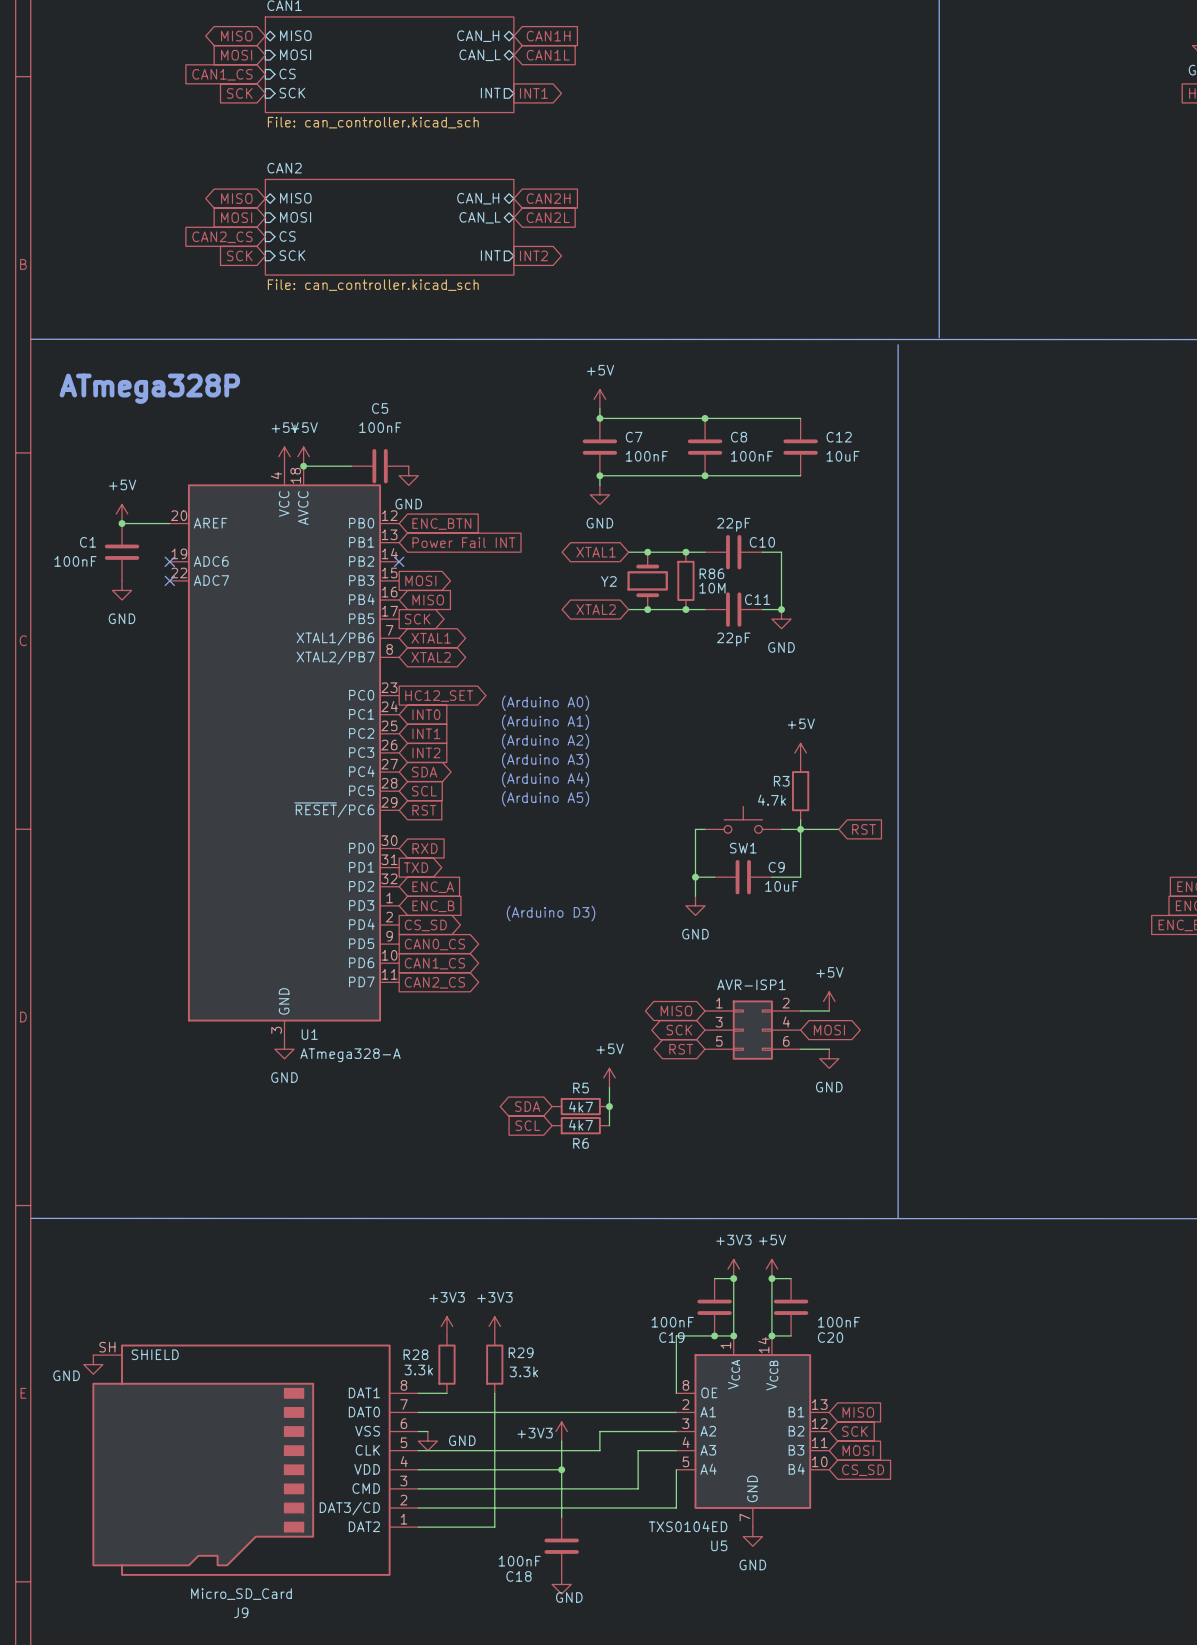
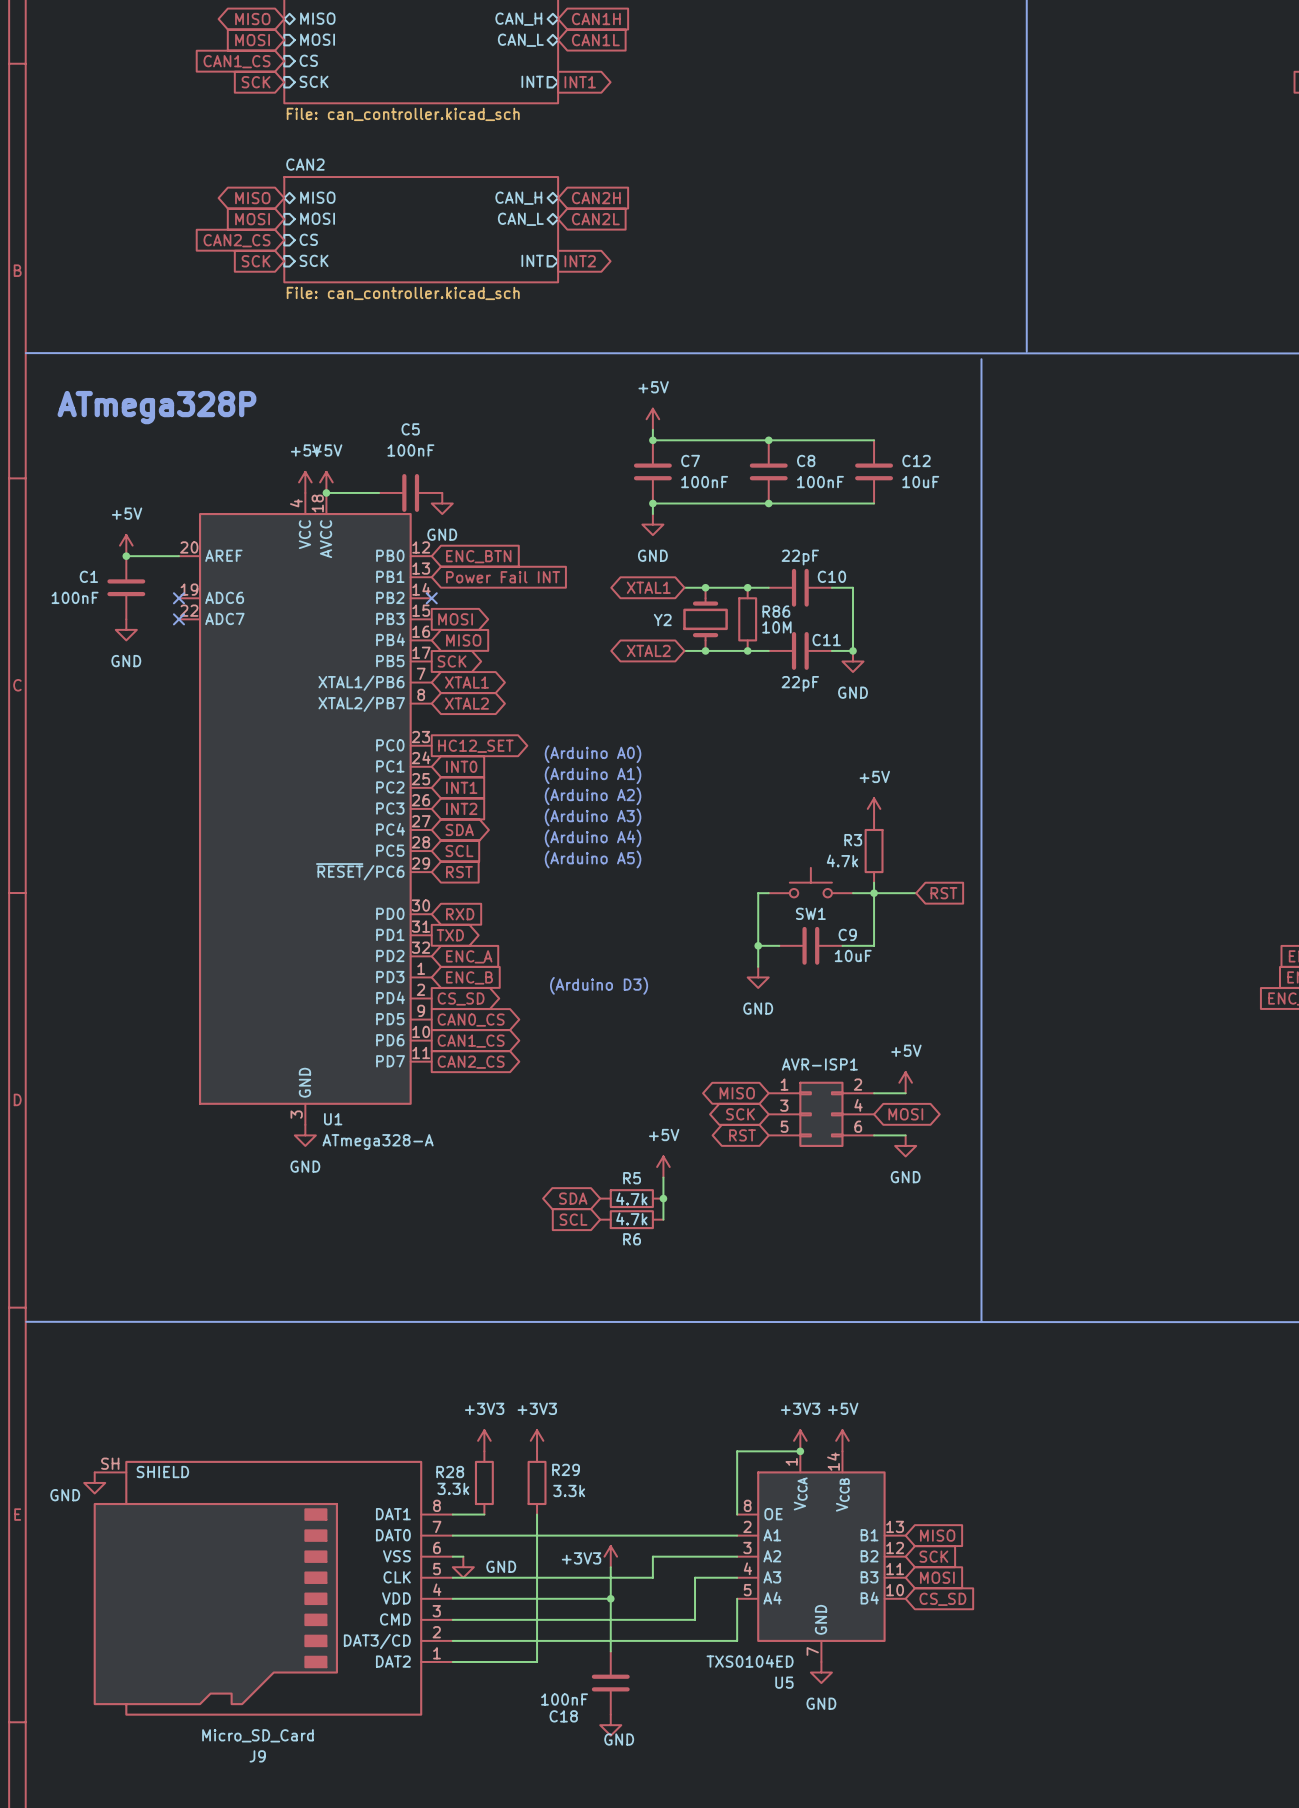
R5 value: 4k7 (581, 1106) -> 4.7k (631, 1199)
R6 value: 4k7 (581, 1125) -> 4.7k (631, 1219)
power symbol position: +3V3 (733, 1269) -> +3V3 (800, 1440)
power symbol position: +5V (771, 1269) -> +5V (842, 1440)
wire: (714, 1278) (733, 1278) (733, 1335) -> none
junction: (733, 1278) -> none
junction: (771, 1278) -> none
wire: (791, 1278) (771, 1278) (771, 1335) (791, 1335) -> none
C19: 100nF (714, 1307) -> none
C20: 100nF (791, 1307) -> none
junction: (714, 1335) -> none
junction: (771, 1335) -> none

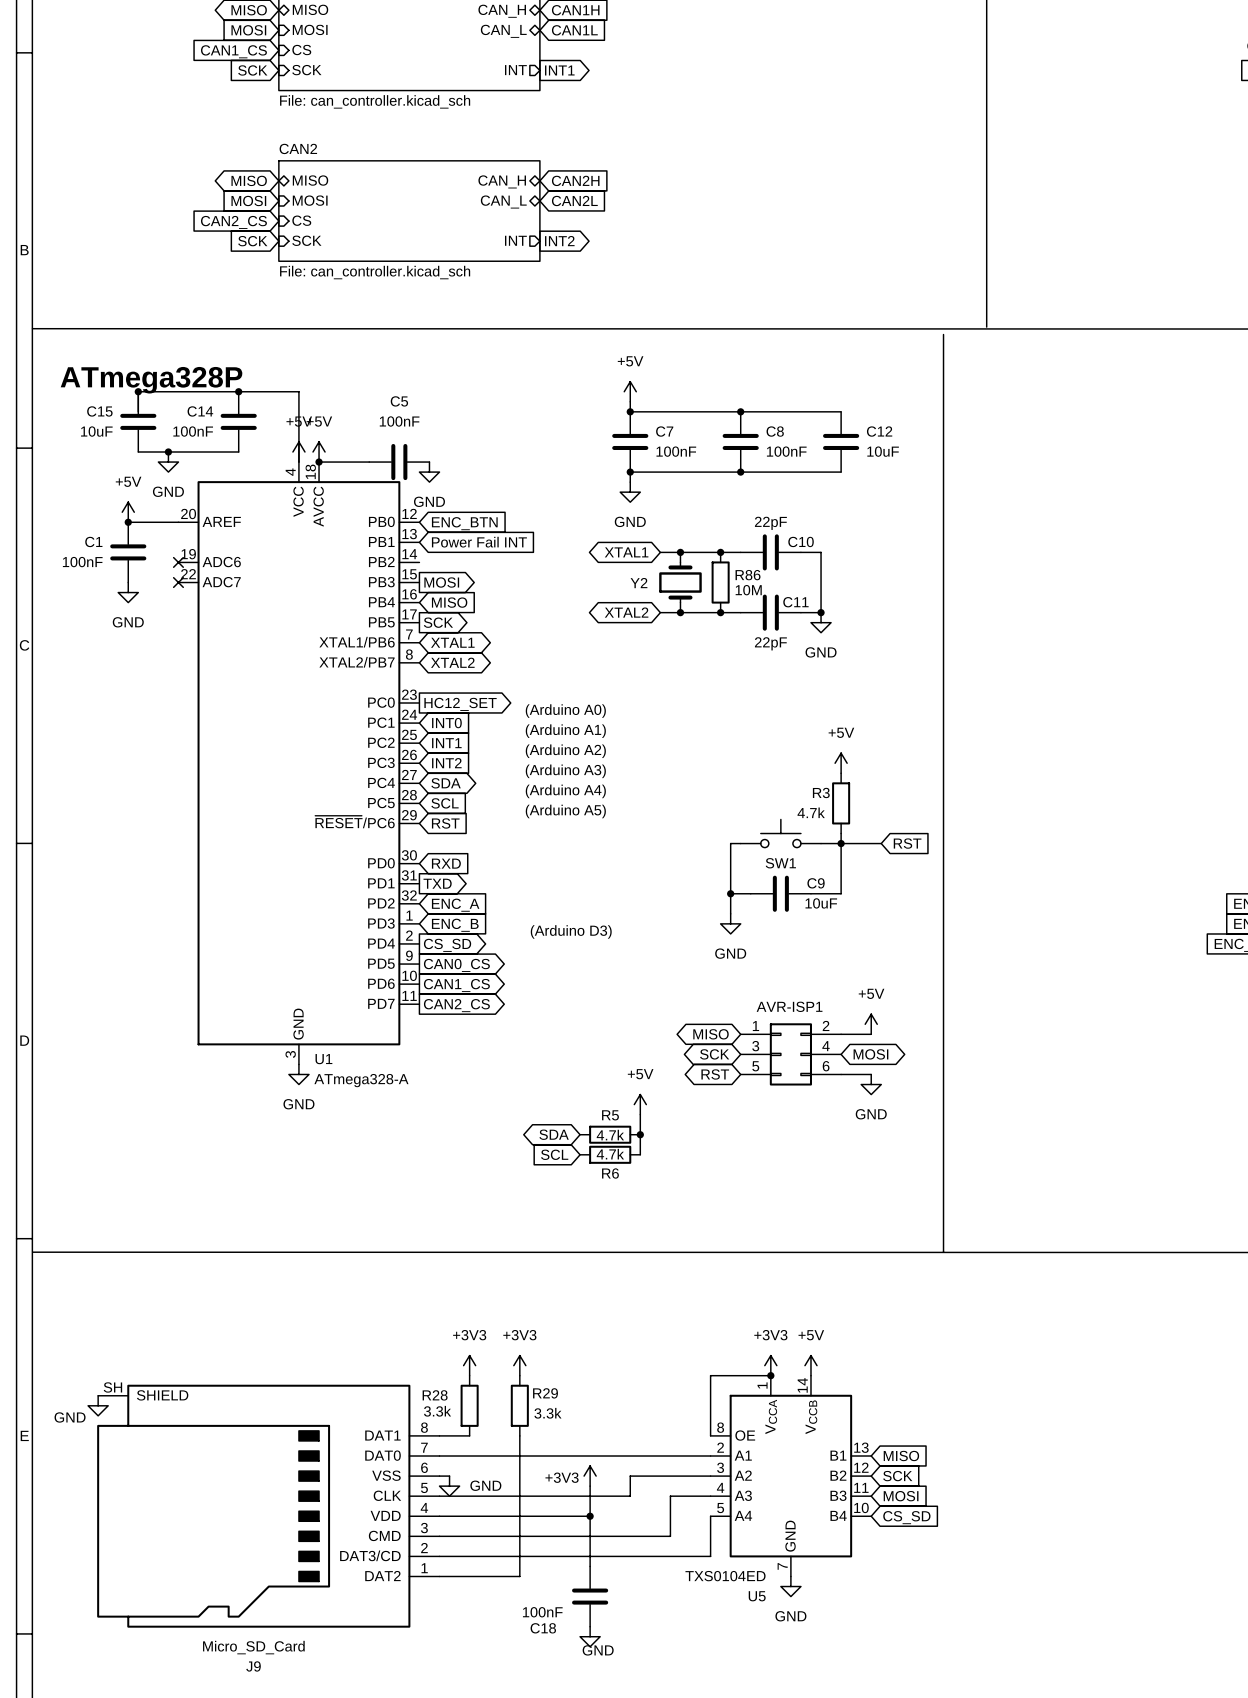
junction: none -> (138, 391)
junction: none -> (238, 391)
wire: none -> (138, 411) (138, 391) (298, 391) (298, 462)
C15: none -> 10uF (138, 421)
C14: none -> 100nF (238, 421)
wire: none -> (138, 452) (238, 452)
junction: none -> (168, 452)
power symbol: none -> GND (168, 462)
no-connect mark: (431, 598) -> none

